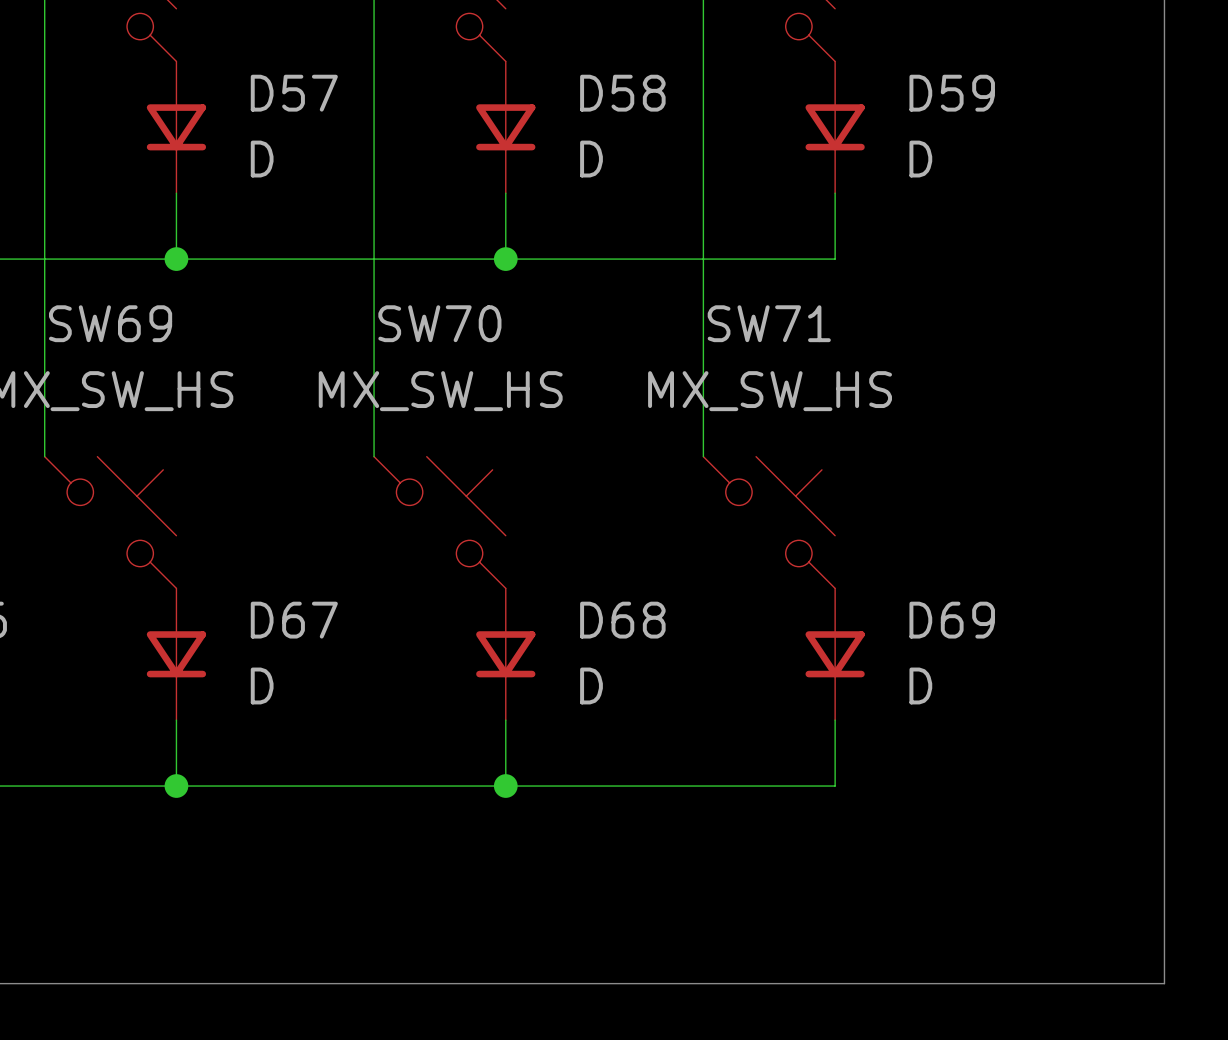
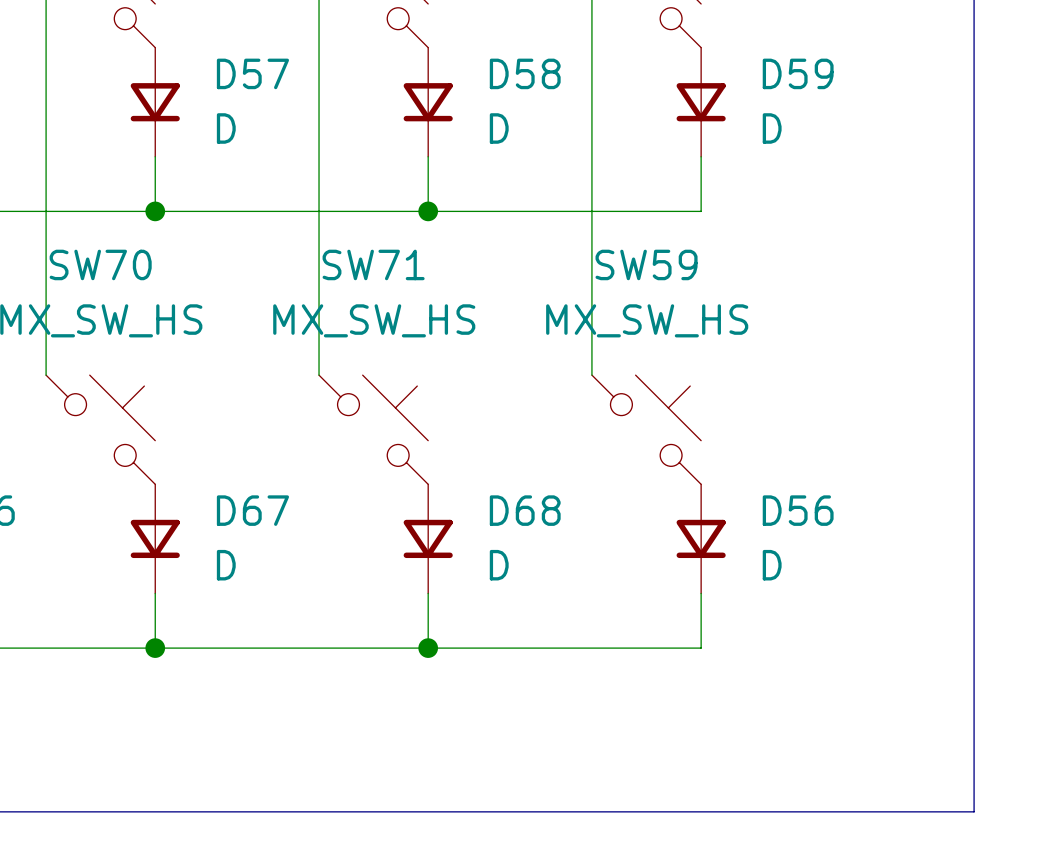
SW69 name: SW69 (110, 323) -> SW70 (100, 264)
SW70 name: SW70 (439, 323) -> SW71 (373, 264)
SW71 name: SW71 (769, 323) -> SW59 (646, 264)
D69 name: D69 (952, 620) -> D56 (798, 510)

